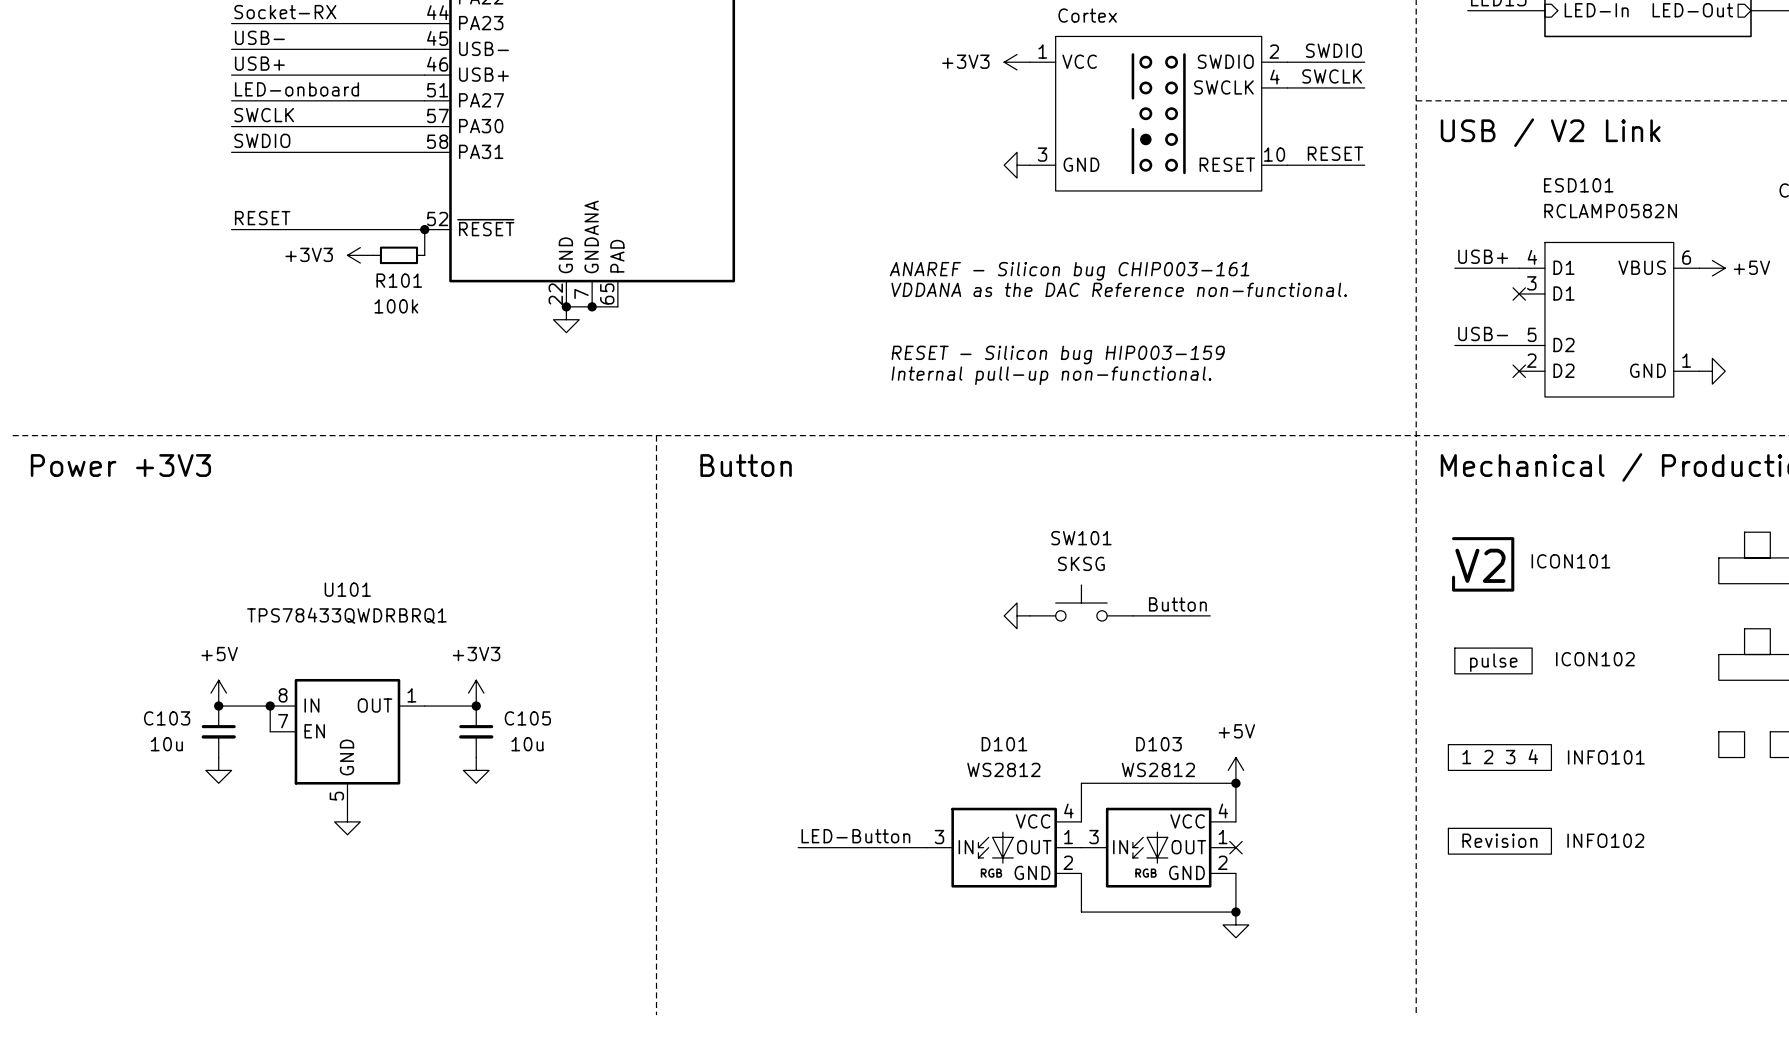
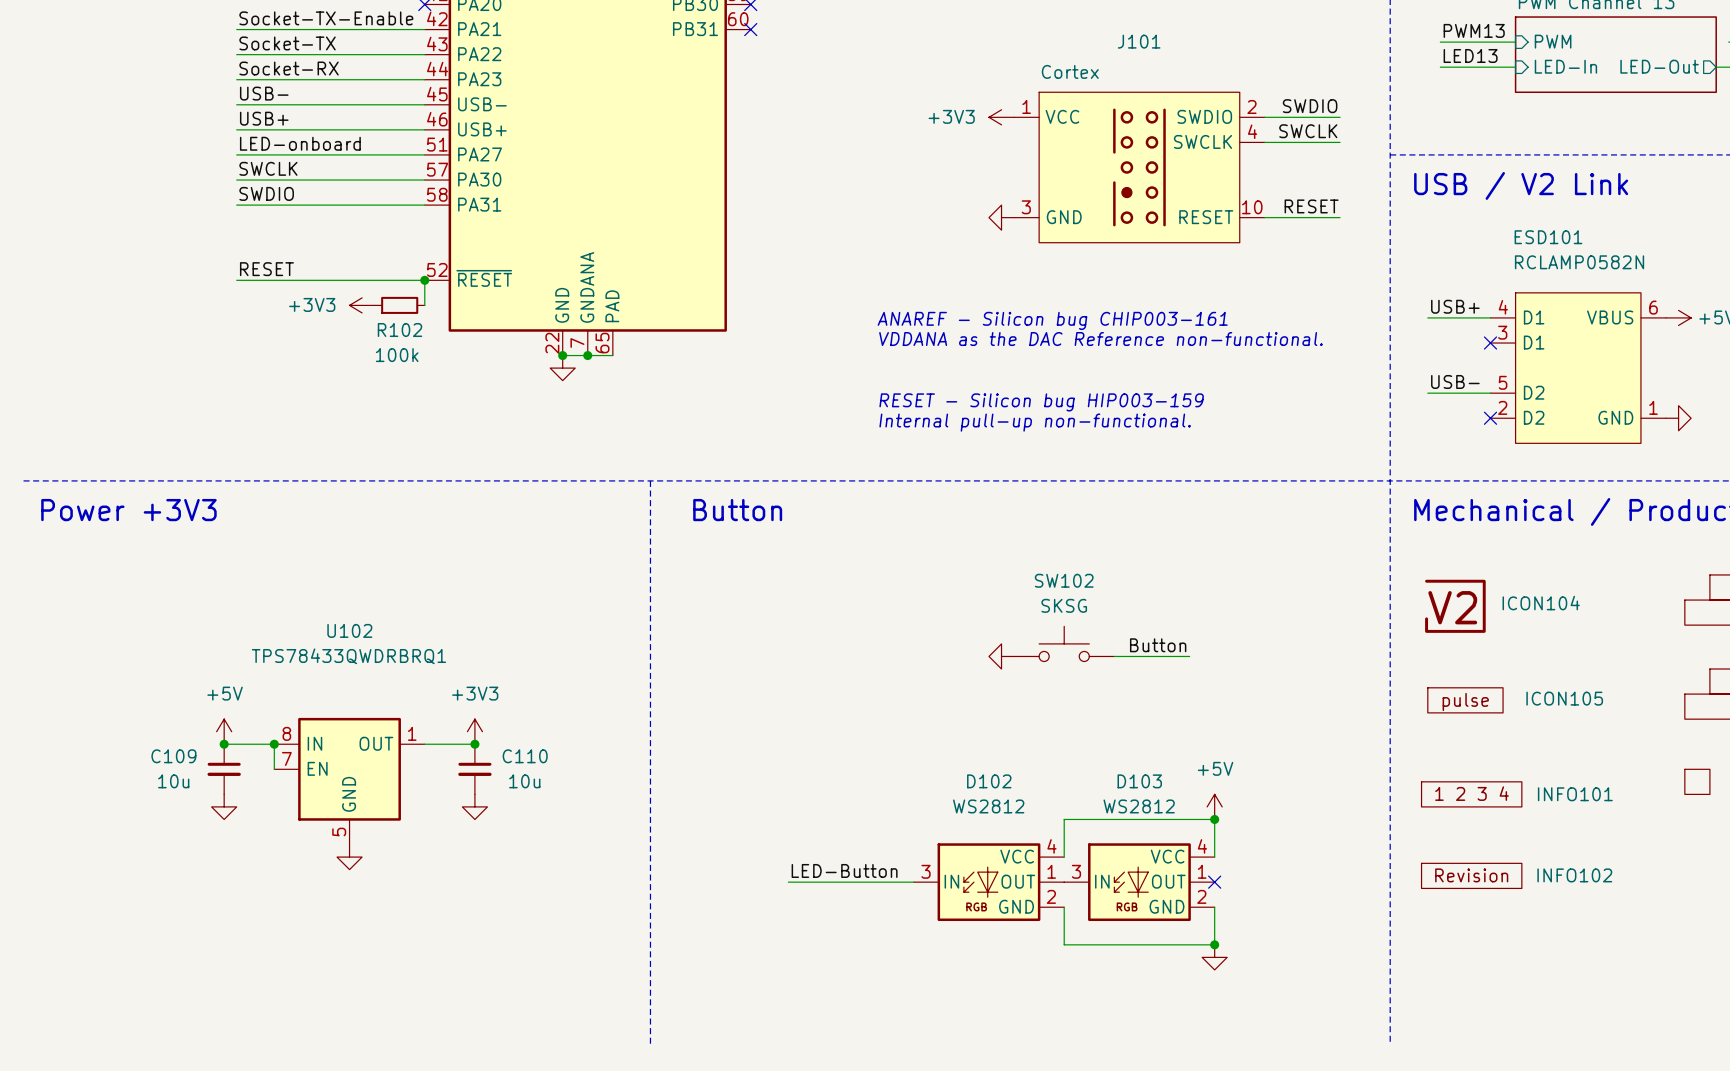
R101 name: R101 (399, 280) -> R102 (400, 330)
SW101 name: SW101 (1081, 538) -> SW102 (1064, 580)
ICON101 name: ICON101 (1570, 561) -> ICON104 (1541, 603)
U101 name: U101 (347, 589) -> U102 (349, 630)
ICON102 name: ICON102 (1595, 659) -> ICON105 (1564, 698)
C103 name: C103 (167, 718) -> C109 (173, 756)
C105 name: C105 (527, 718) -> C110 (525, 756)
D101 name: D101 (1004, 744) -> D102 (989, 781)

